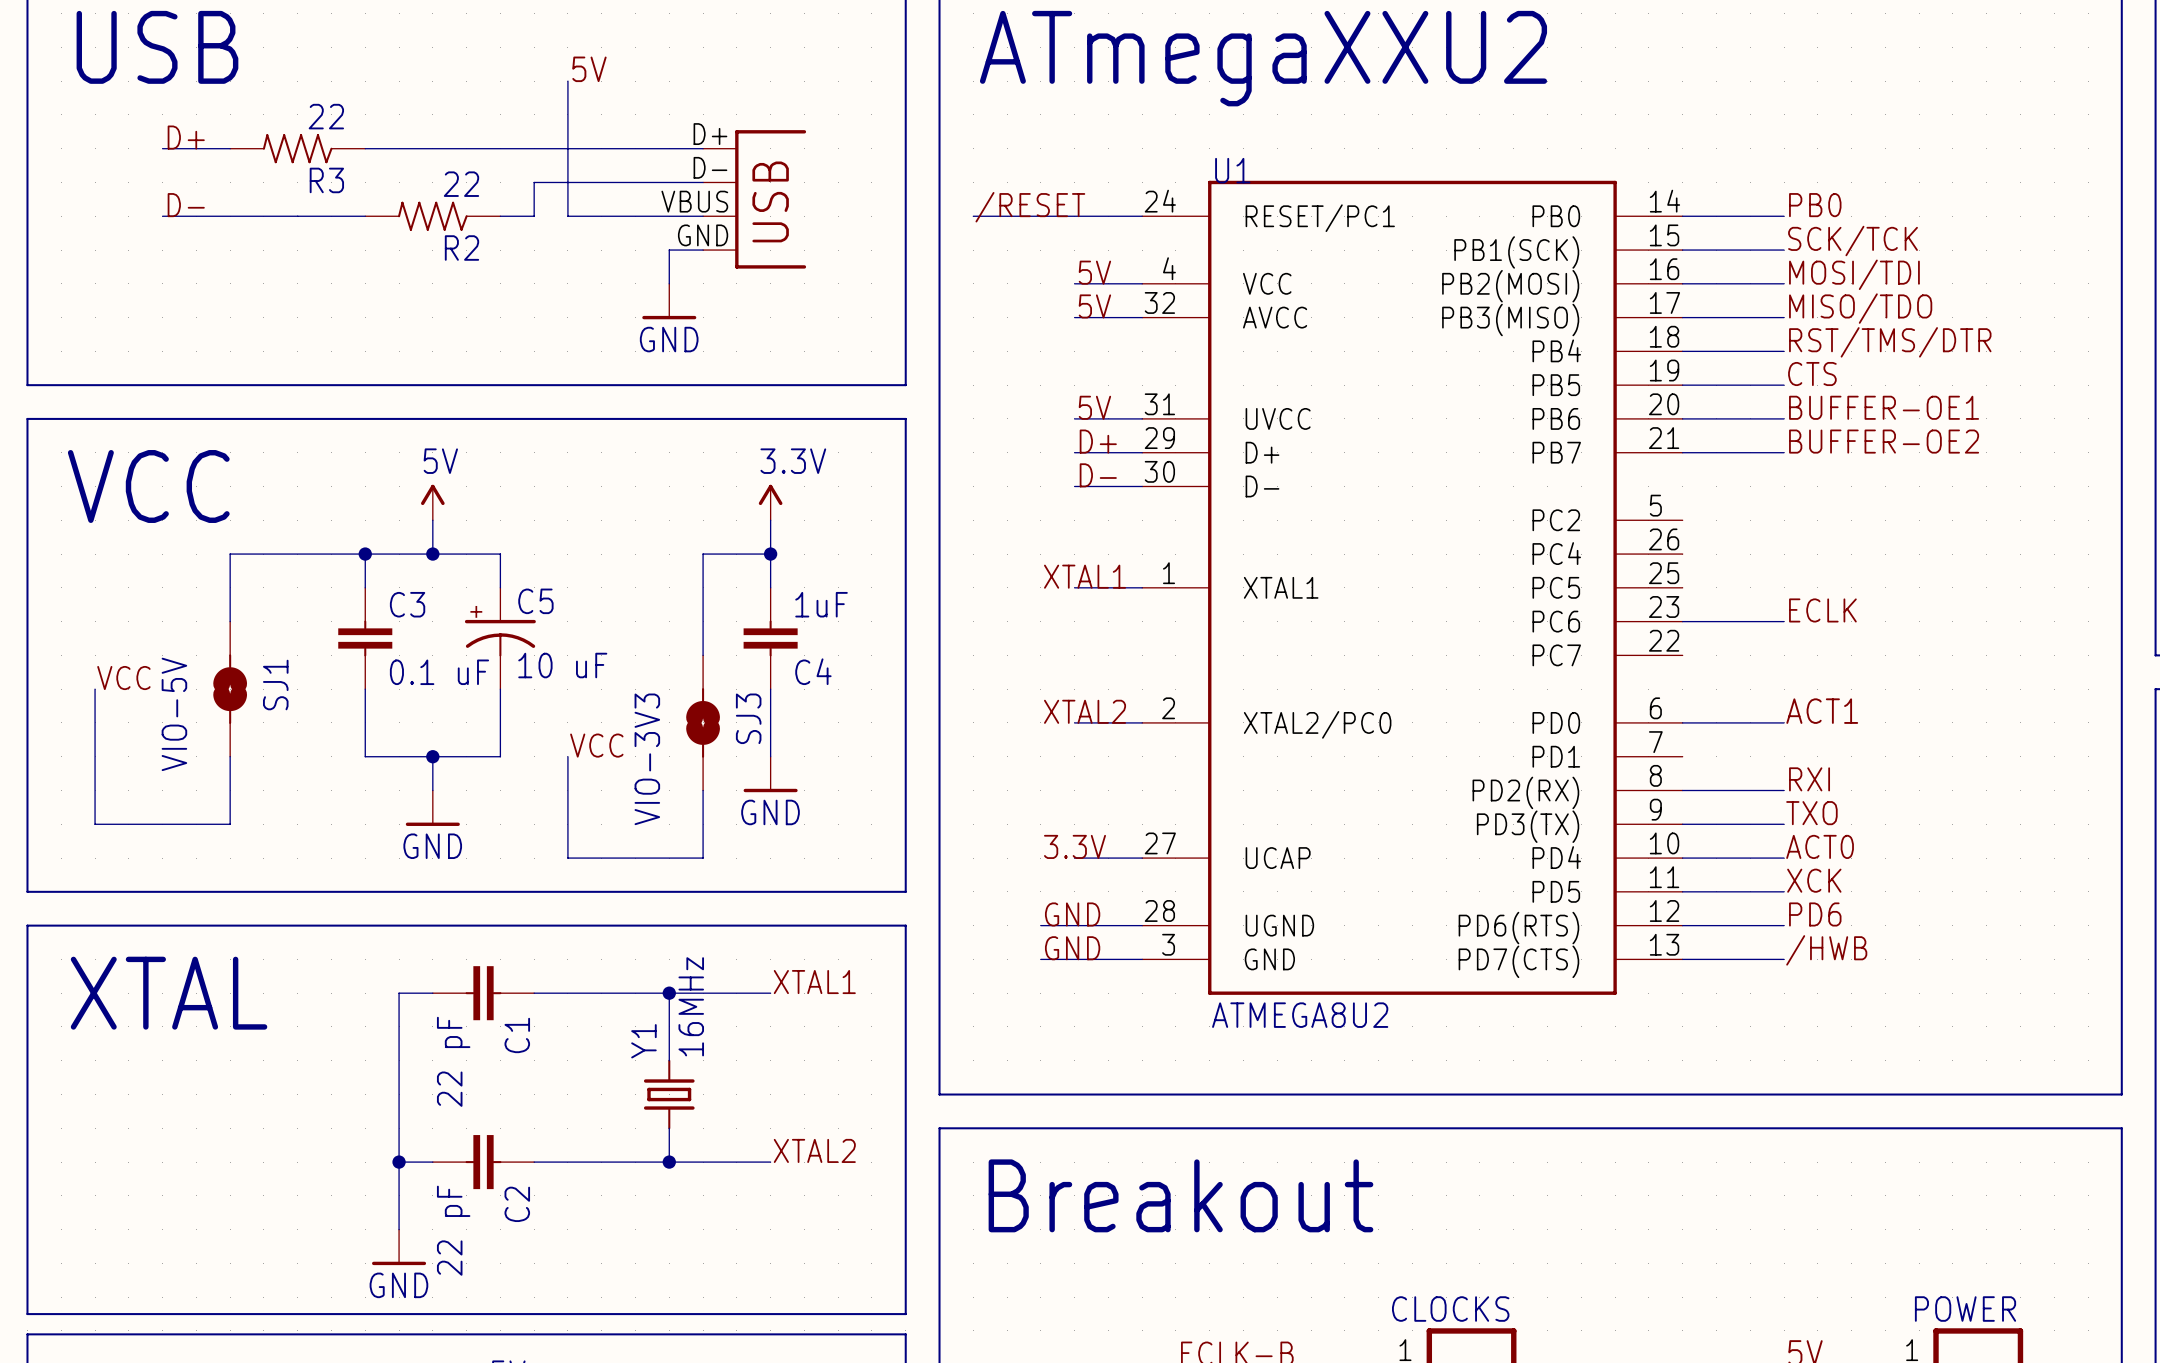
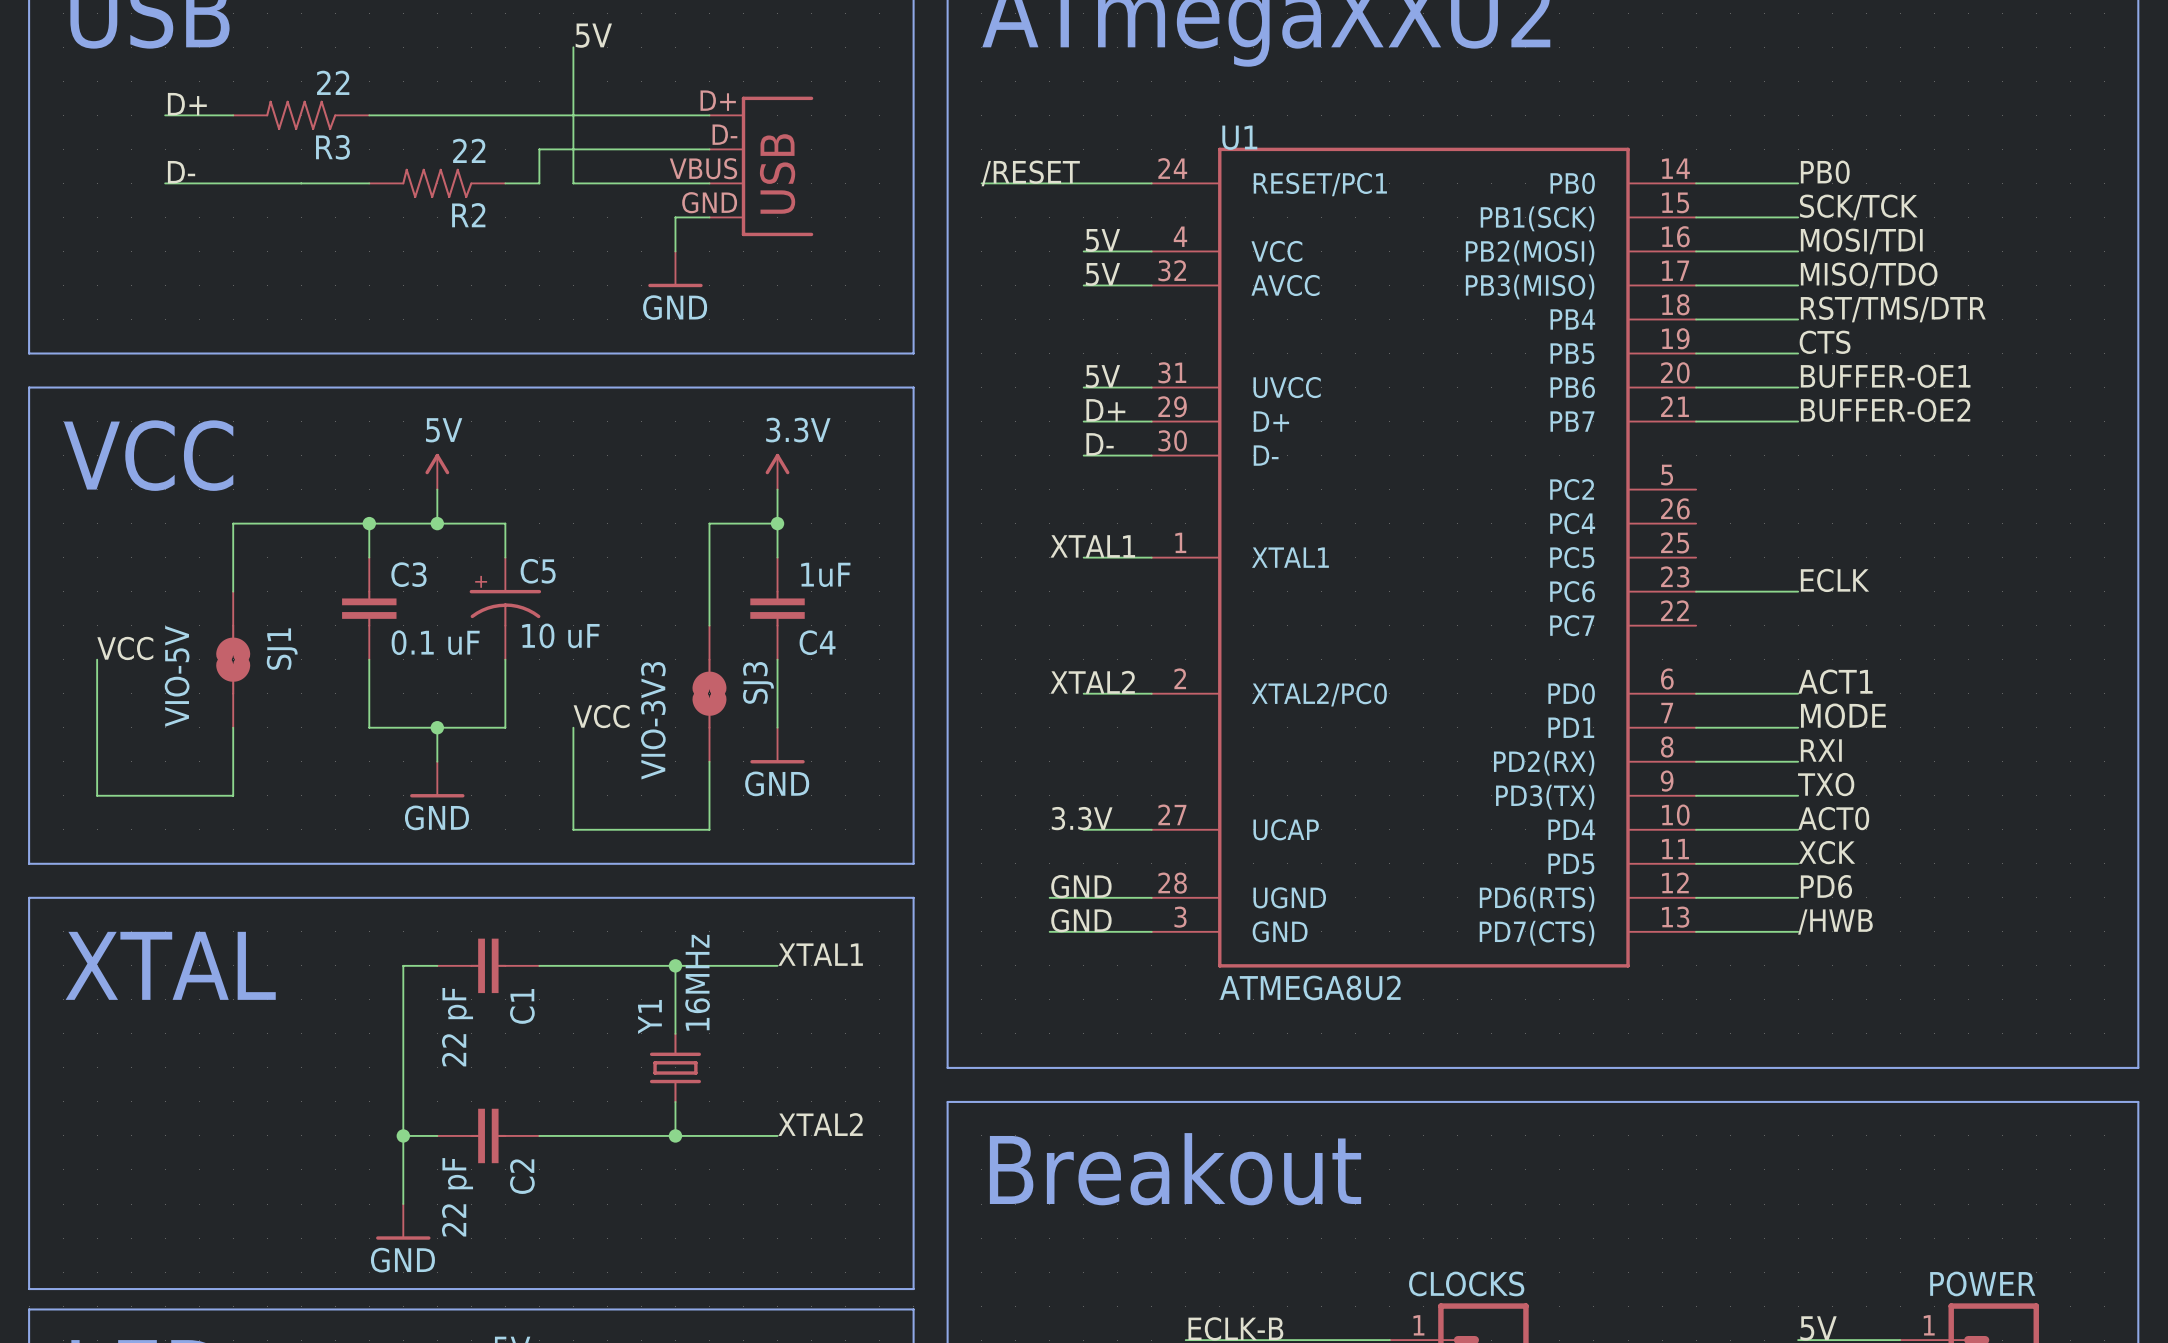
label: none -> MODE (1843, 715)
wire: none -> (1696, 727) (1798, 727)

